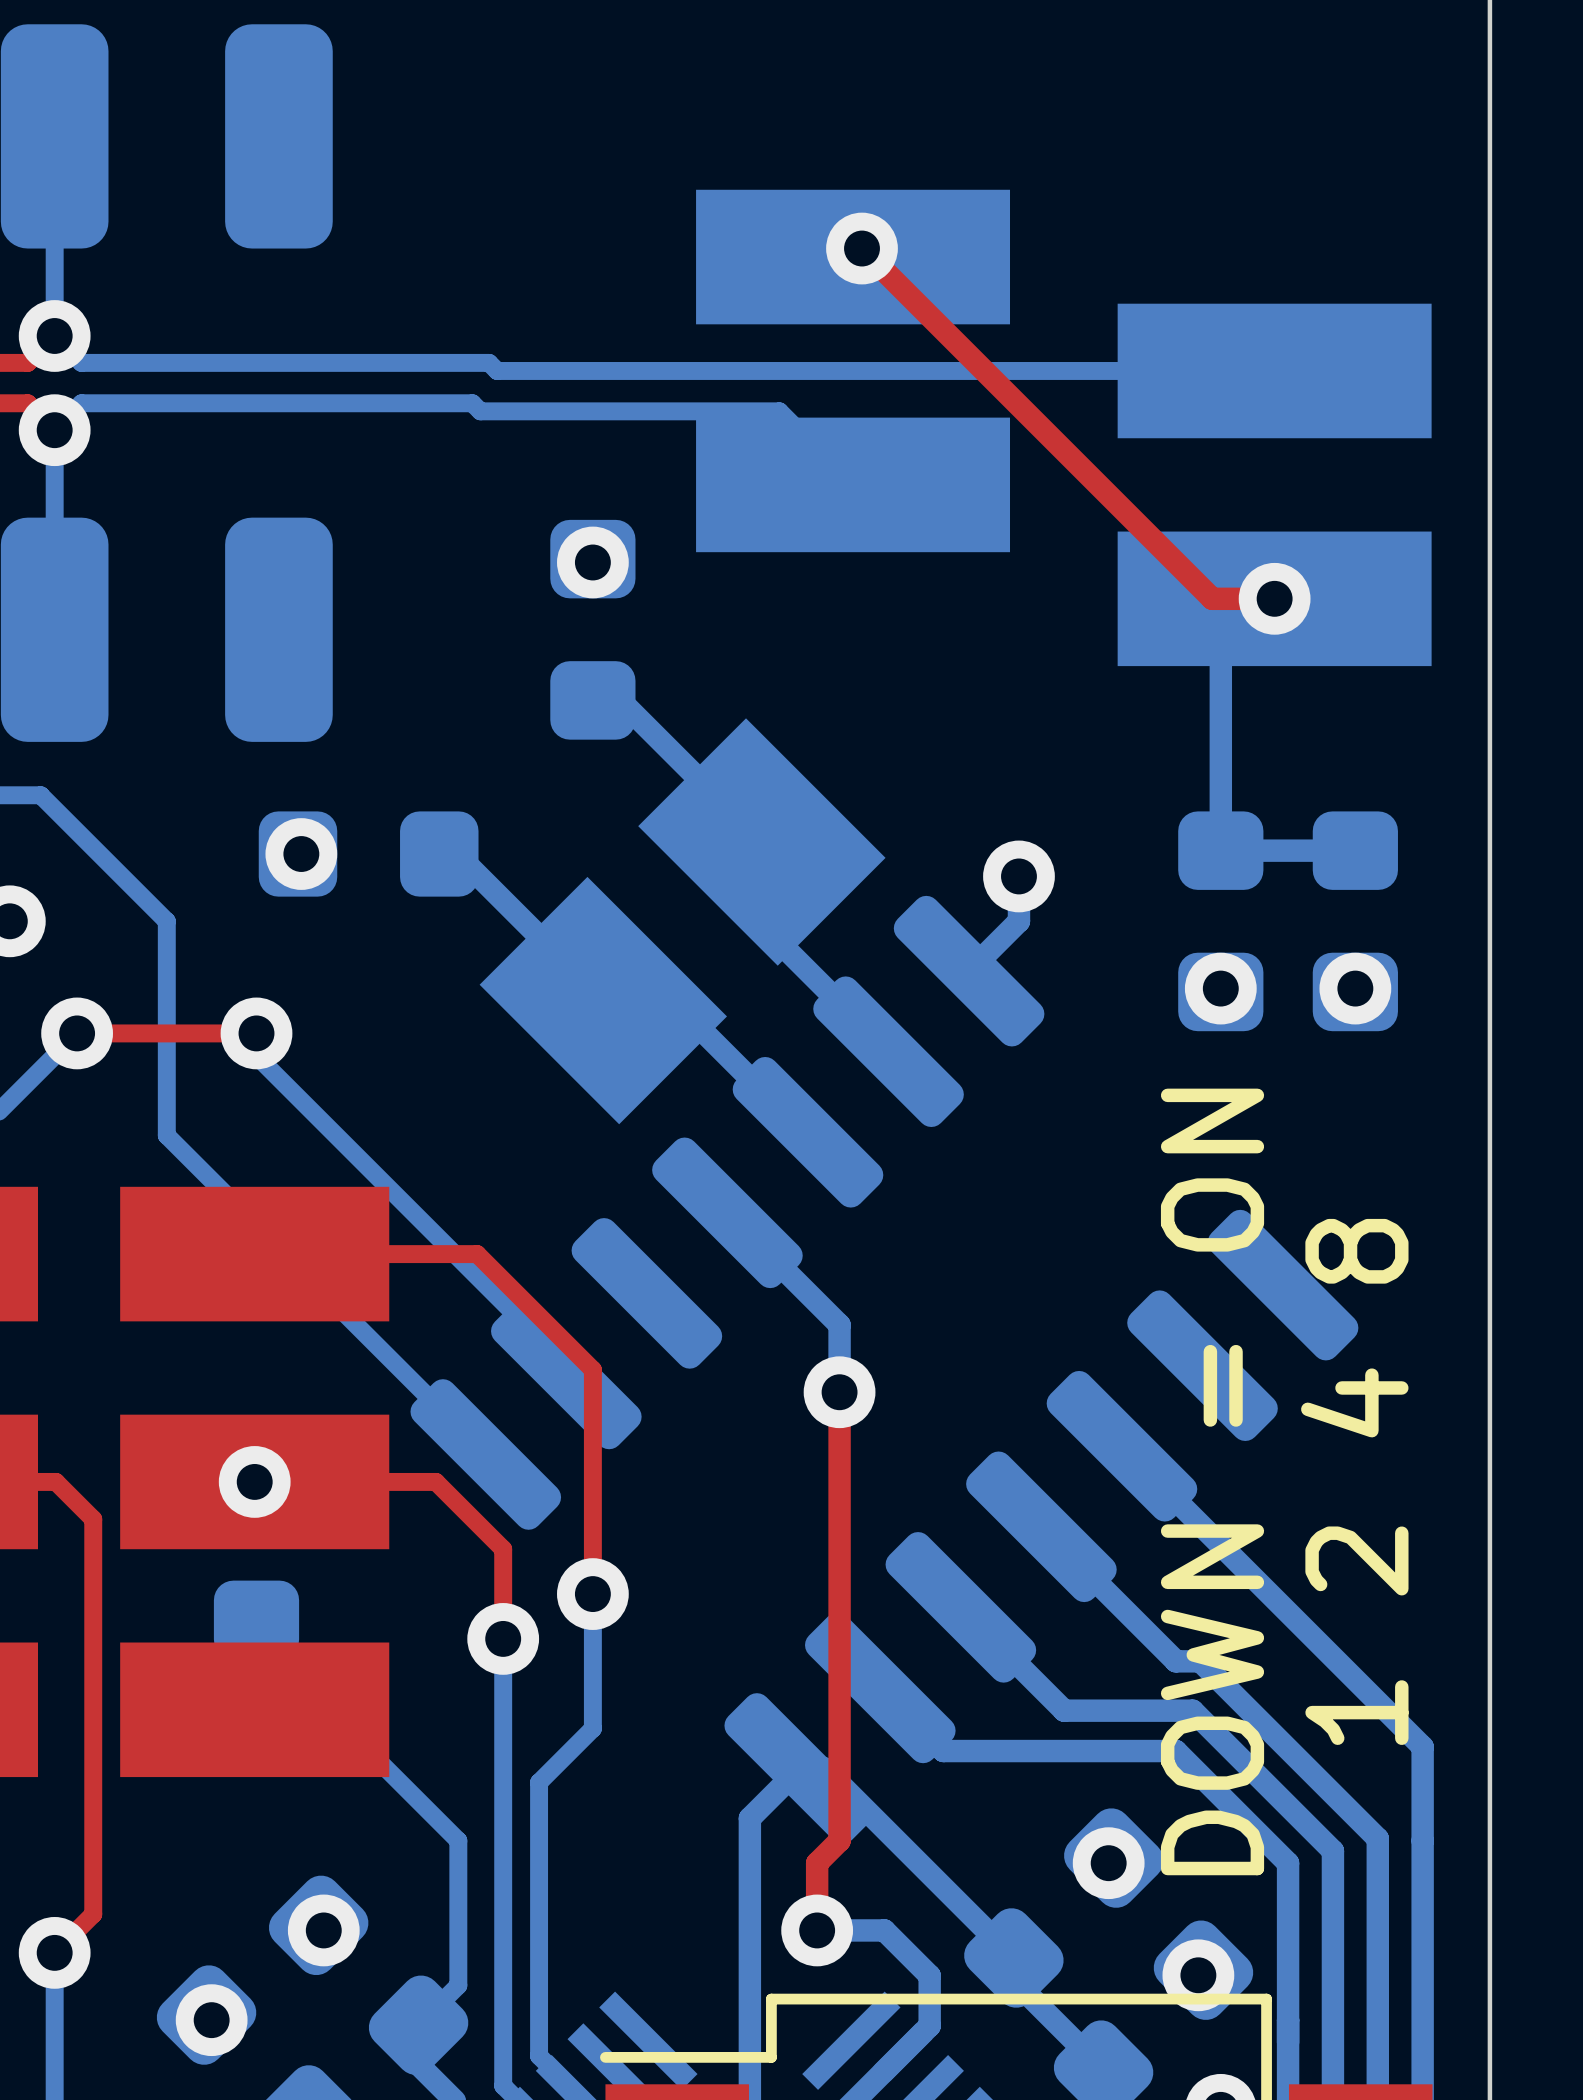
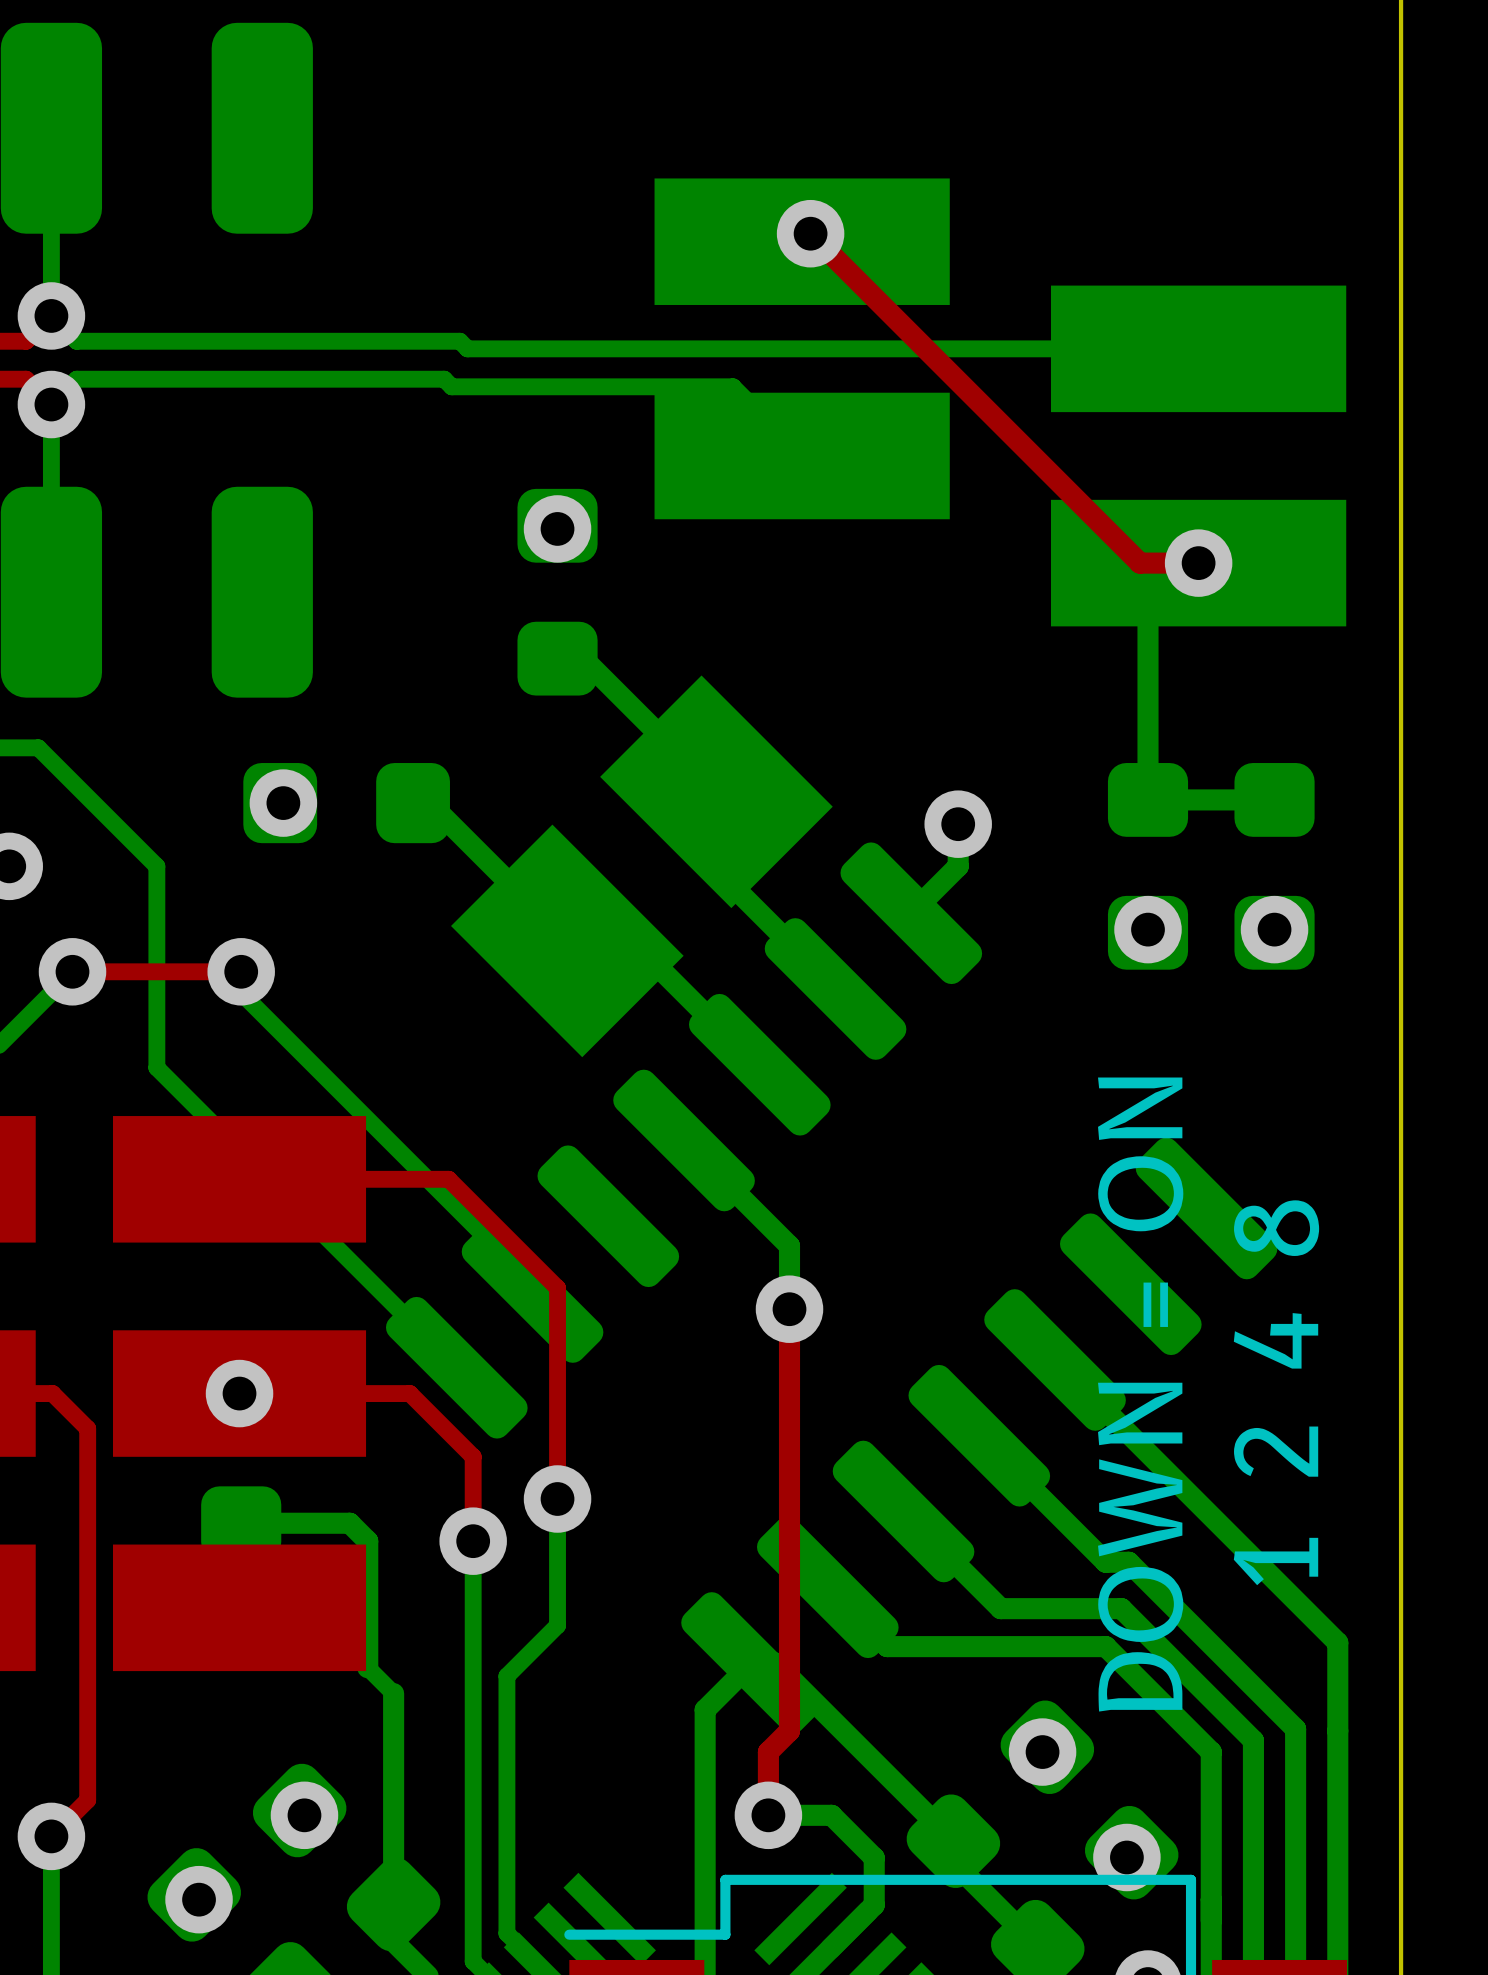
bottom track: none -> (241, 1523) (349, 1523) (367, 1541) (367, 1667)
bottom track: (418, 1800) (458, 1840) (458, 1985) (418, 2025) -> (393, 1693) (393, 1904)

